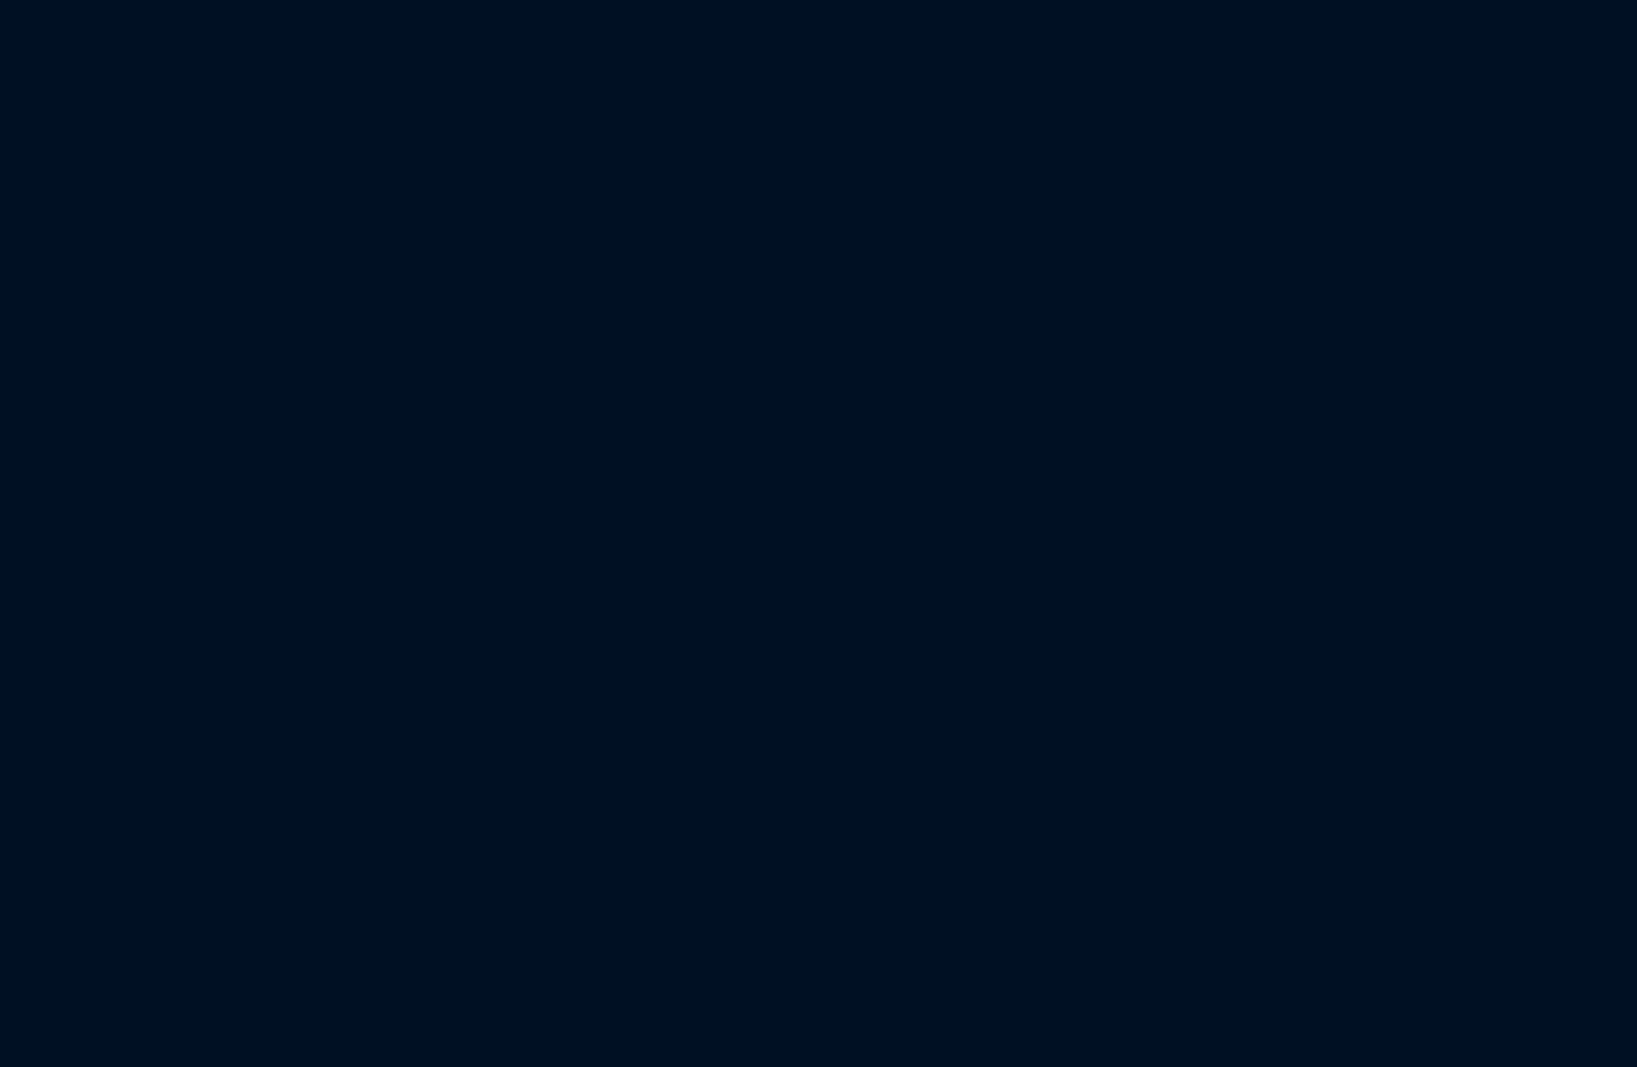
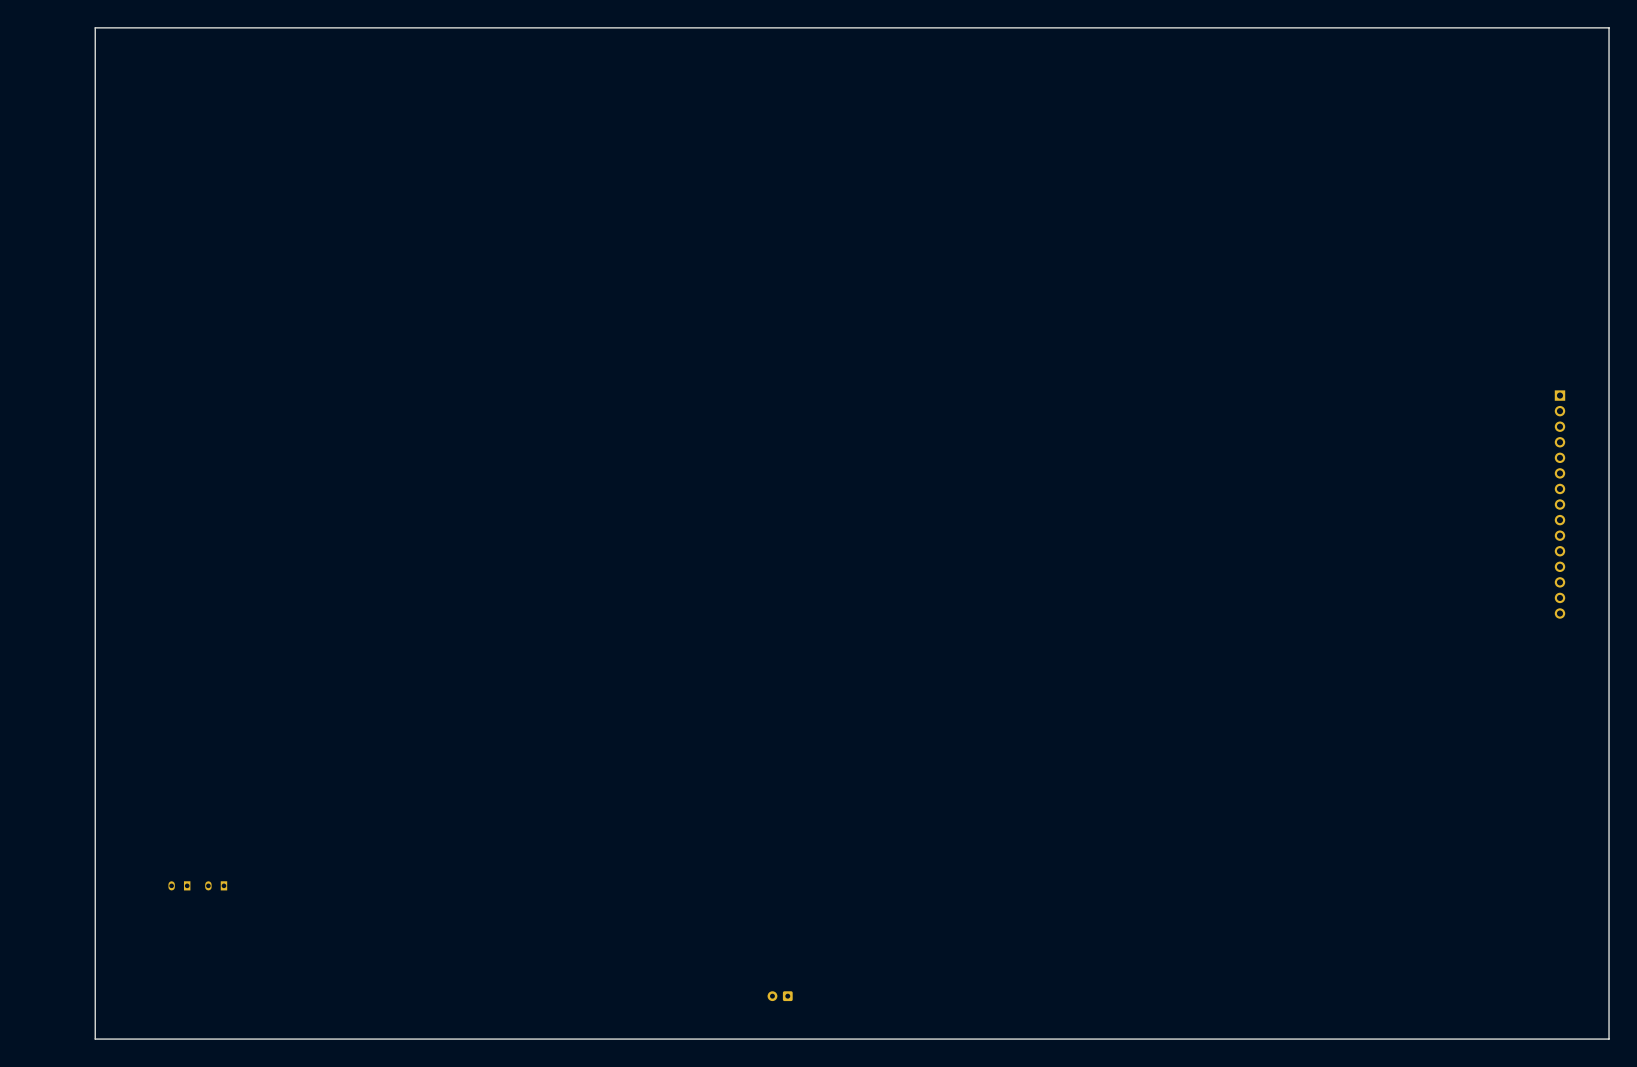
board edge: none -> (1609, 27) (95, 27) (95, 1039) (1609, 1039) (1609, 27)
part: none -> (1559, 504)
part: none -> (179, 885)
part: none -> (216, 885)
part: none -> (780, 996)

